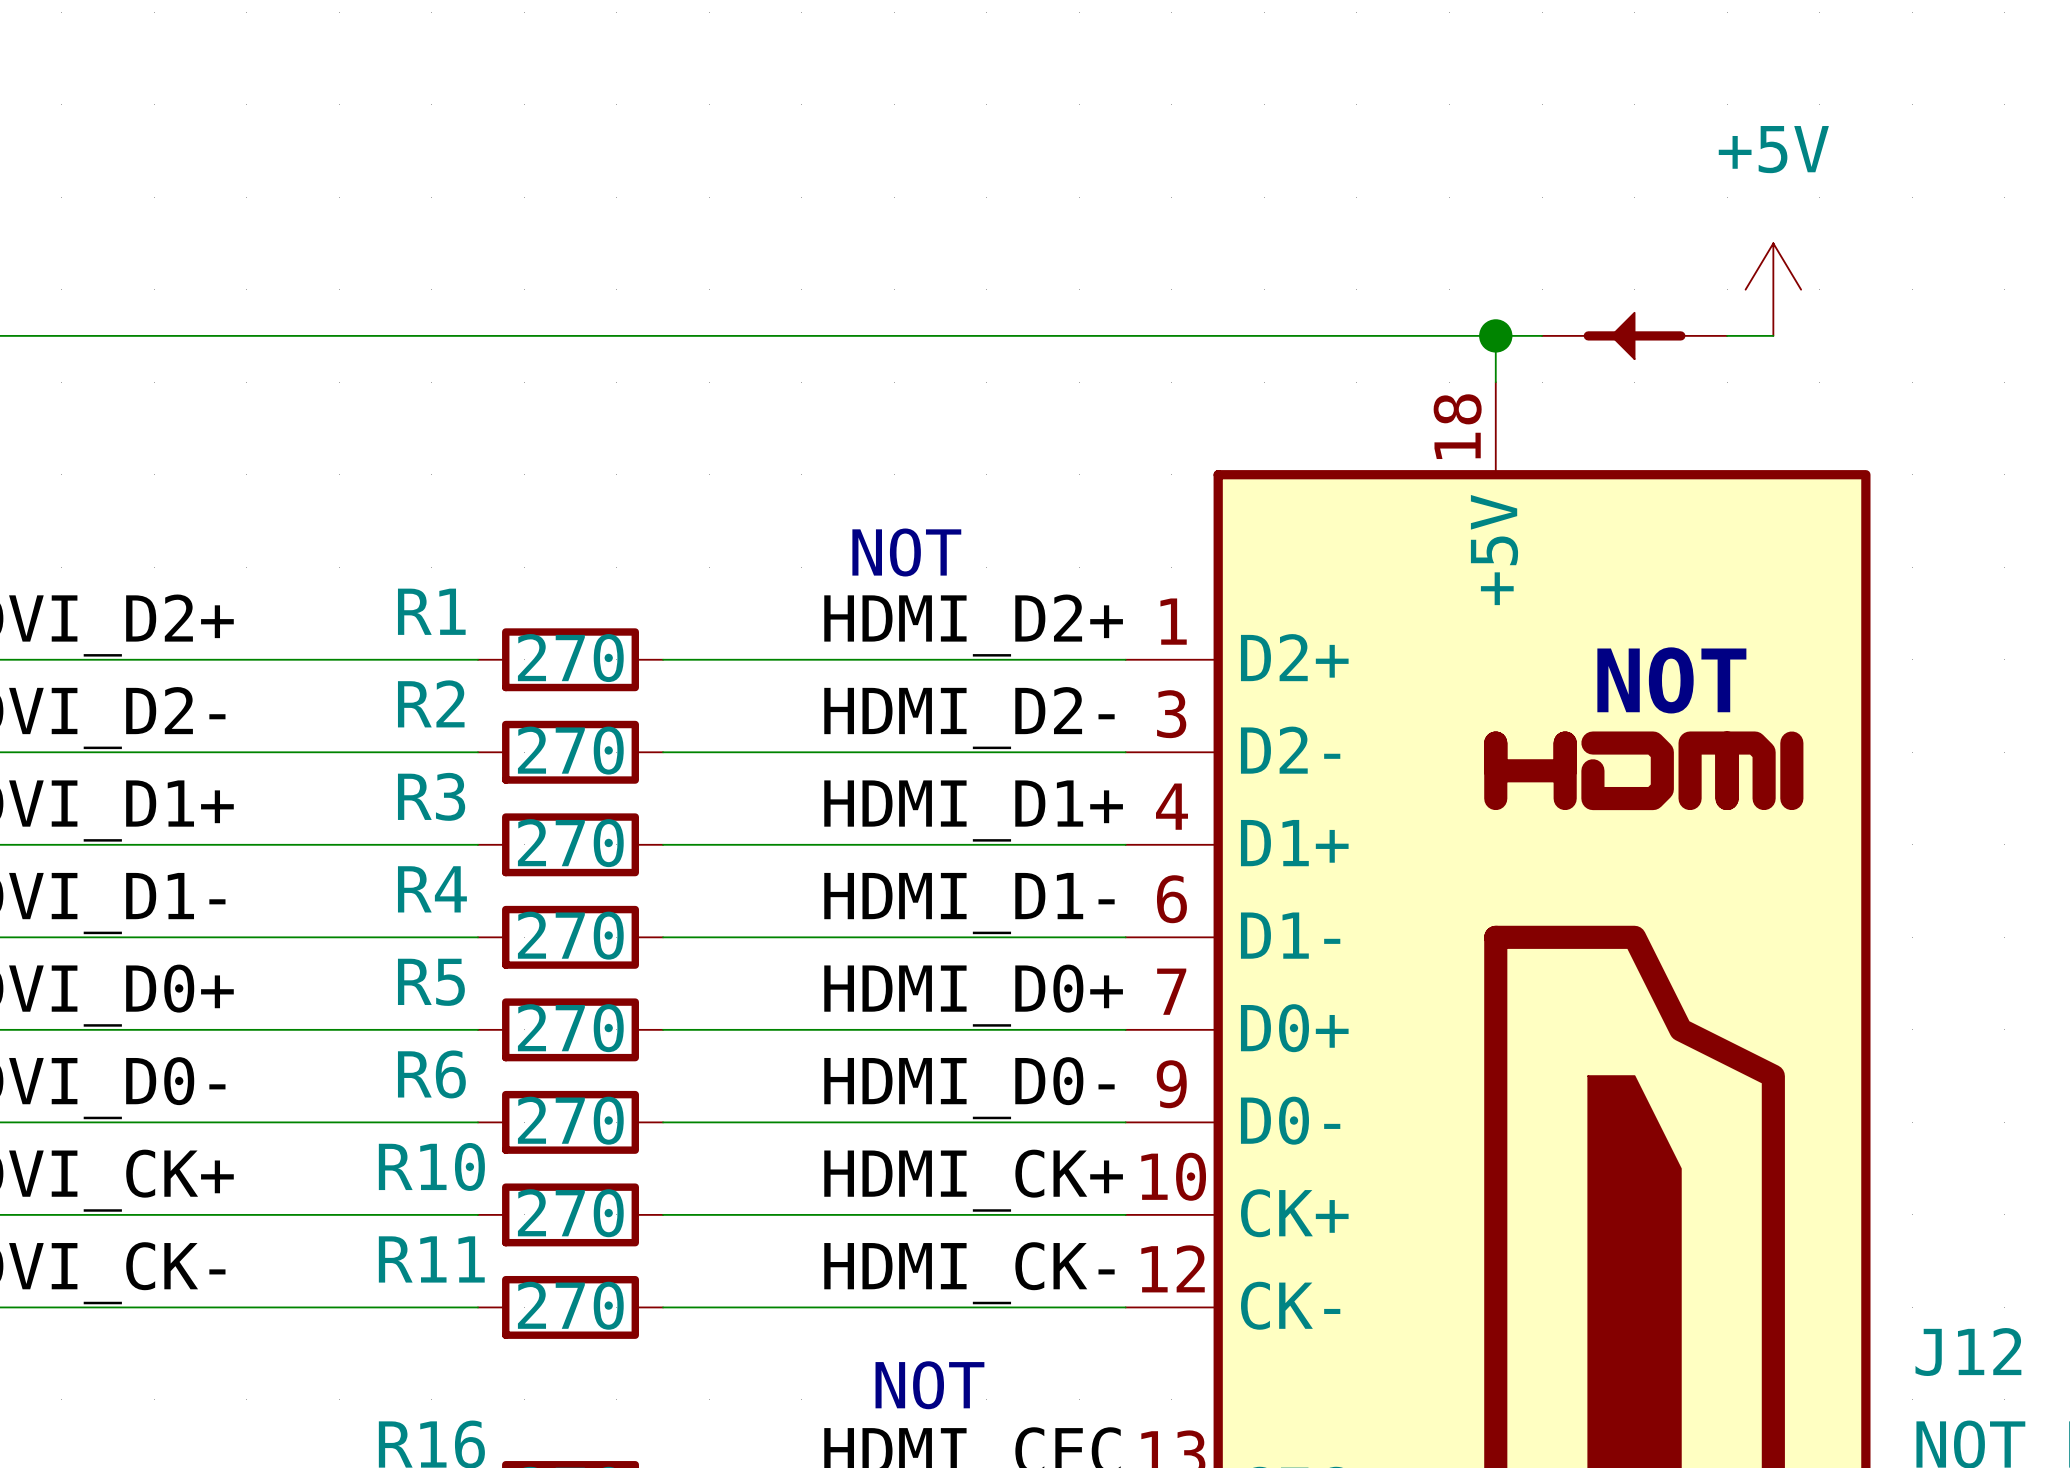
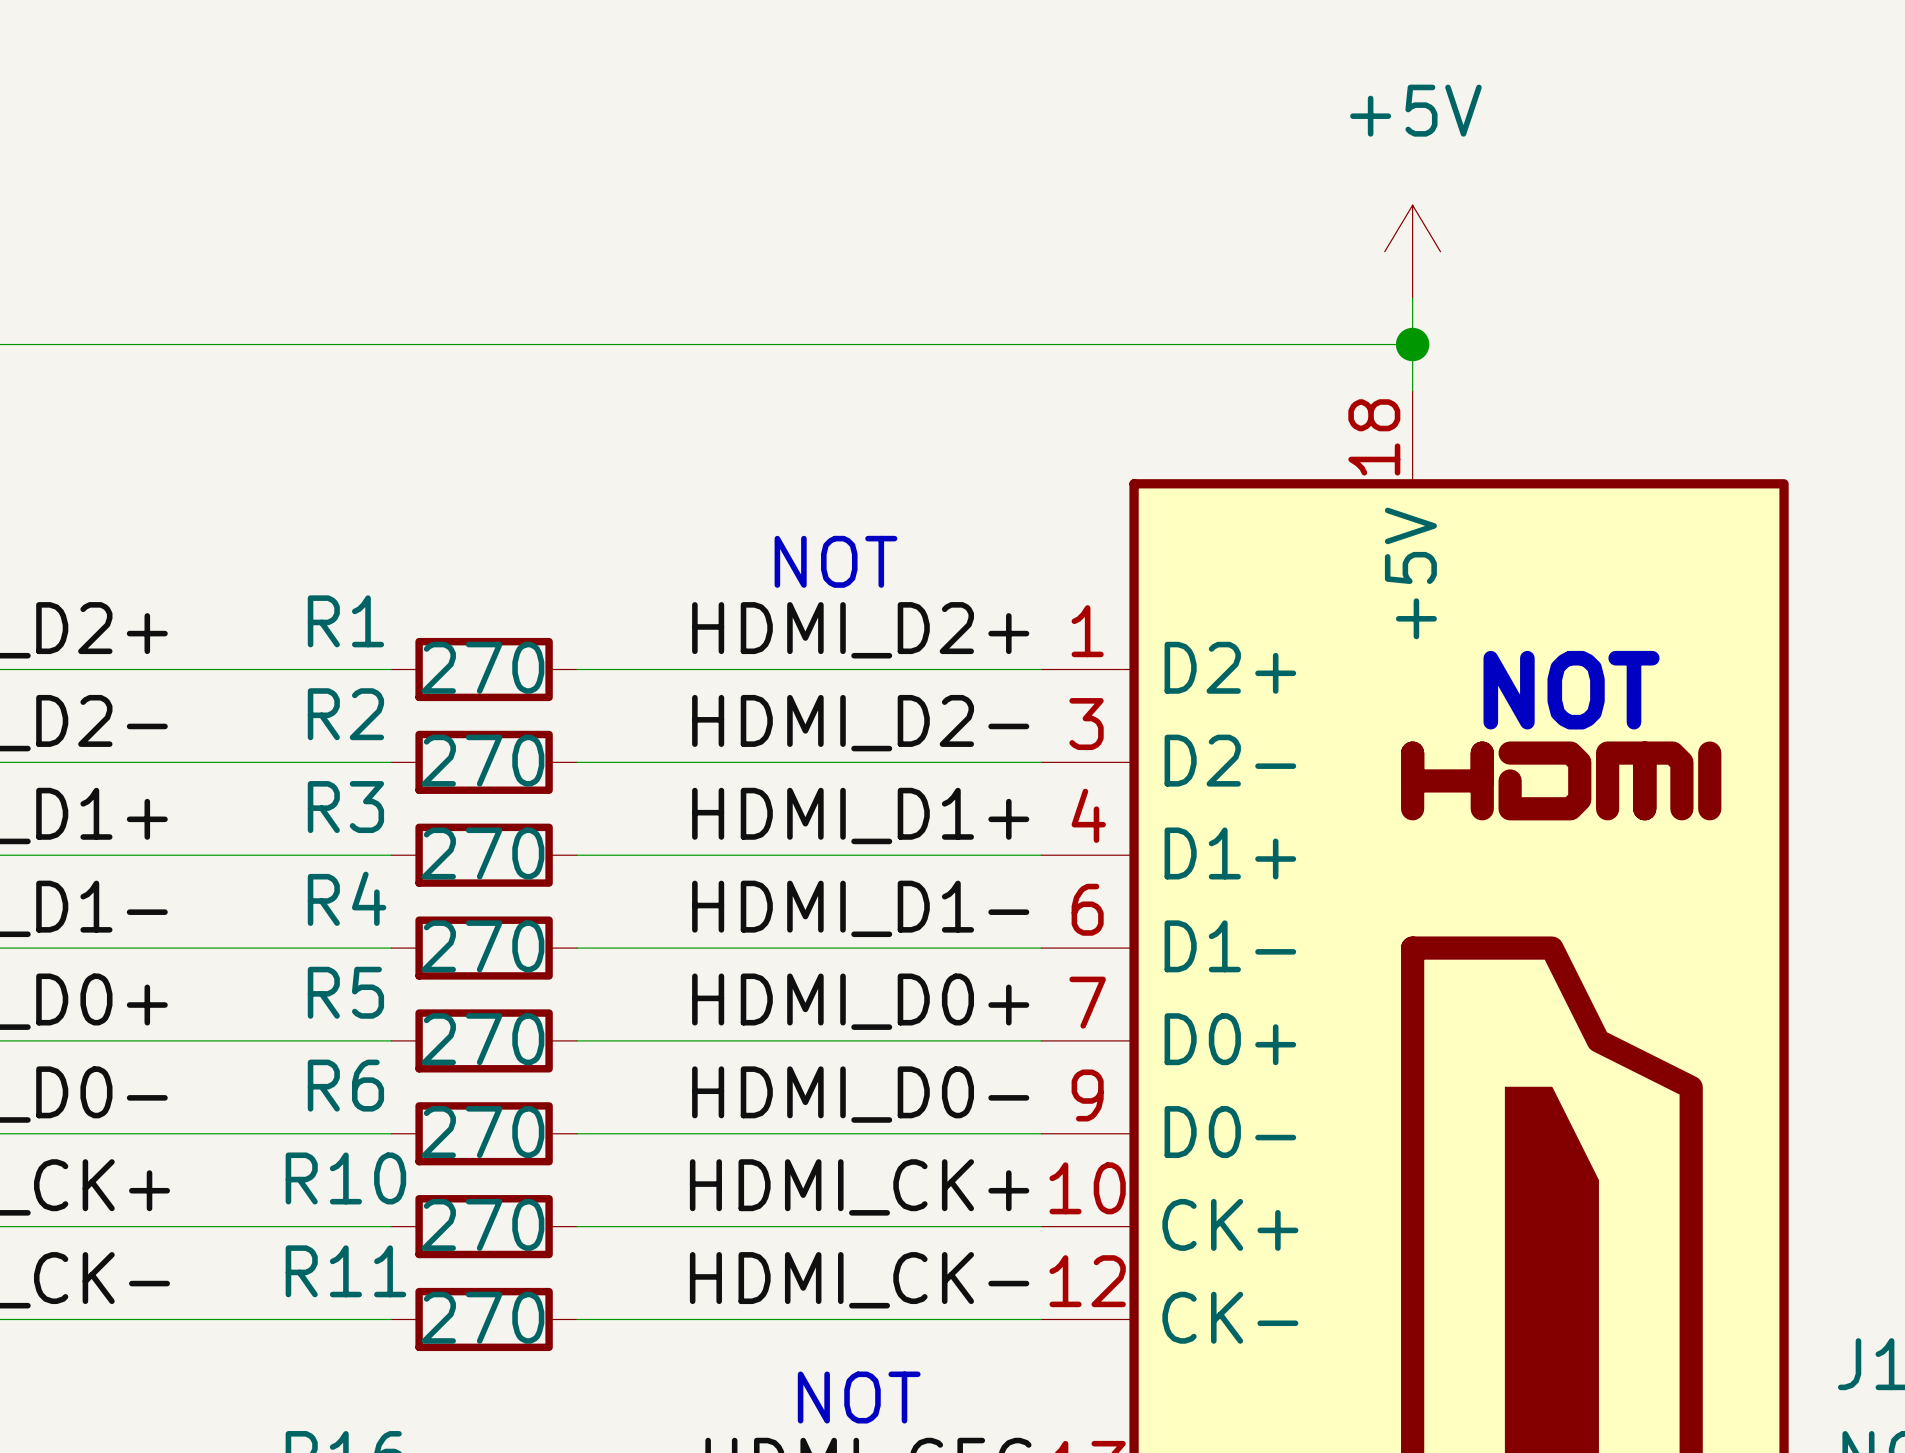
power symbol position: +5V (1773, 289) -> +5V (1412, 251)
wire: (1495, 335) (1542, 335) -> (1412, 344) (1412, 298)
part: (1634, 335) -> none
wire: (1727, 335) (1773, 335) -> none

